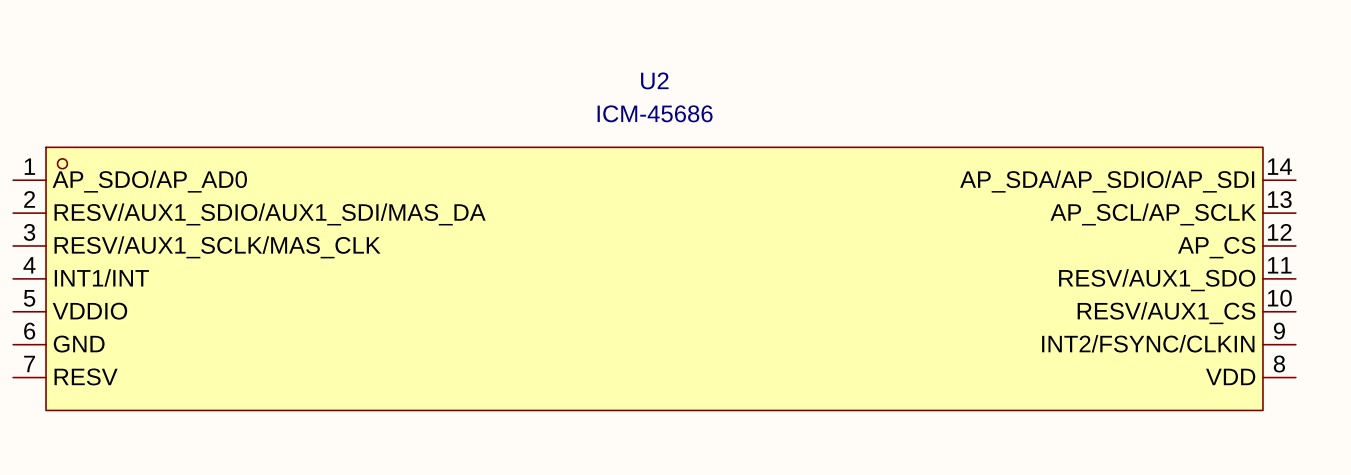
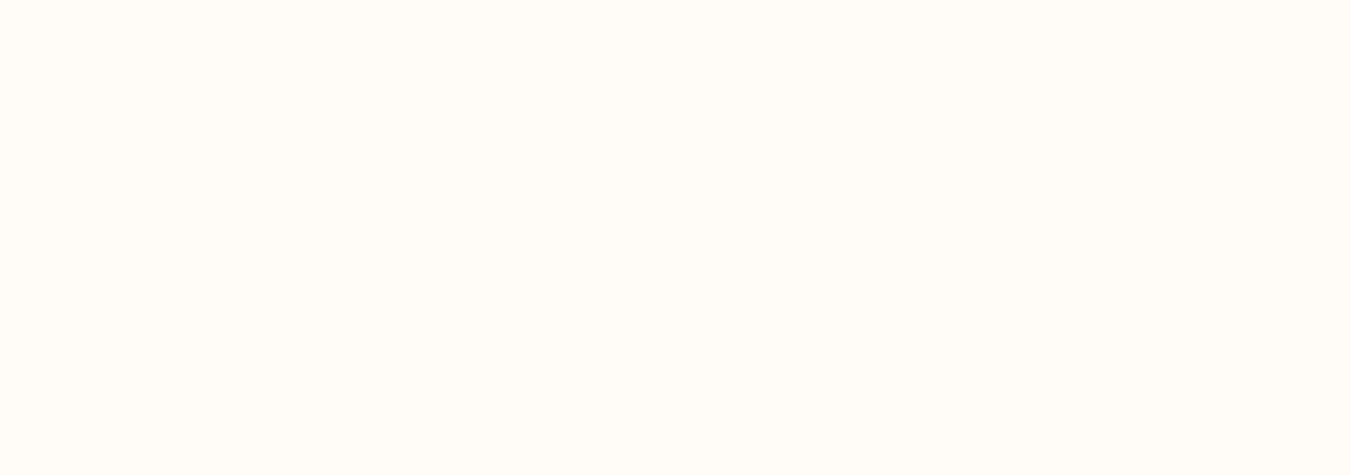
U2: ICM-45686 (654, 278) -> none

